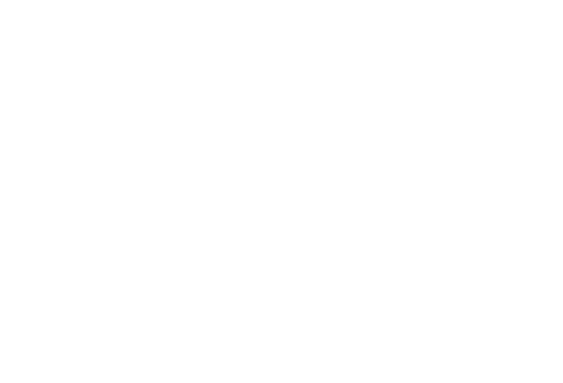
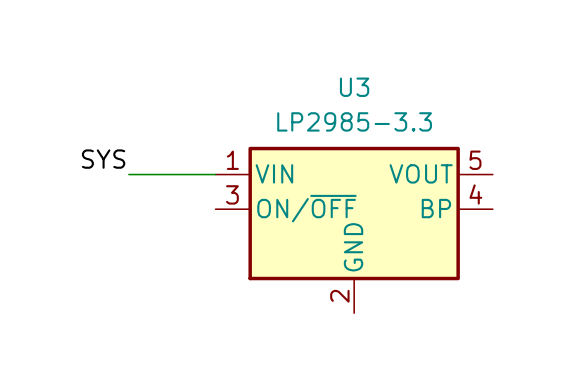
label: none -> SYS (103, 159)
wire: none -> (128, 174) (215, 174)
U3: none -> LP2985-3.3 (354, 230)

